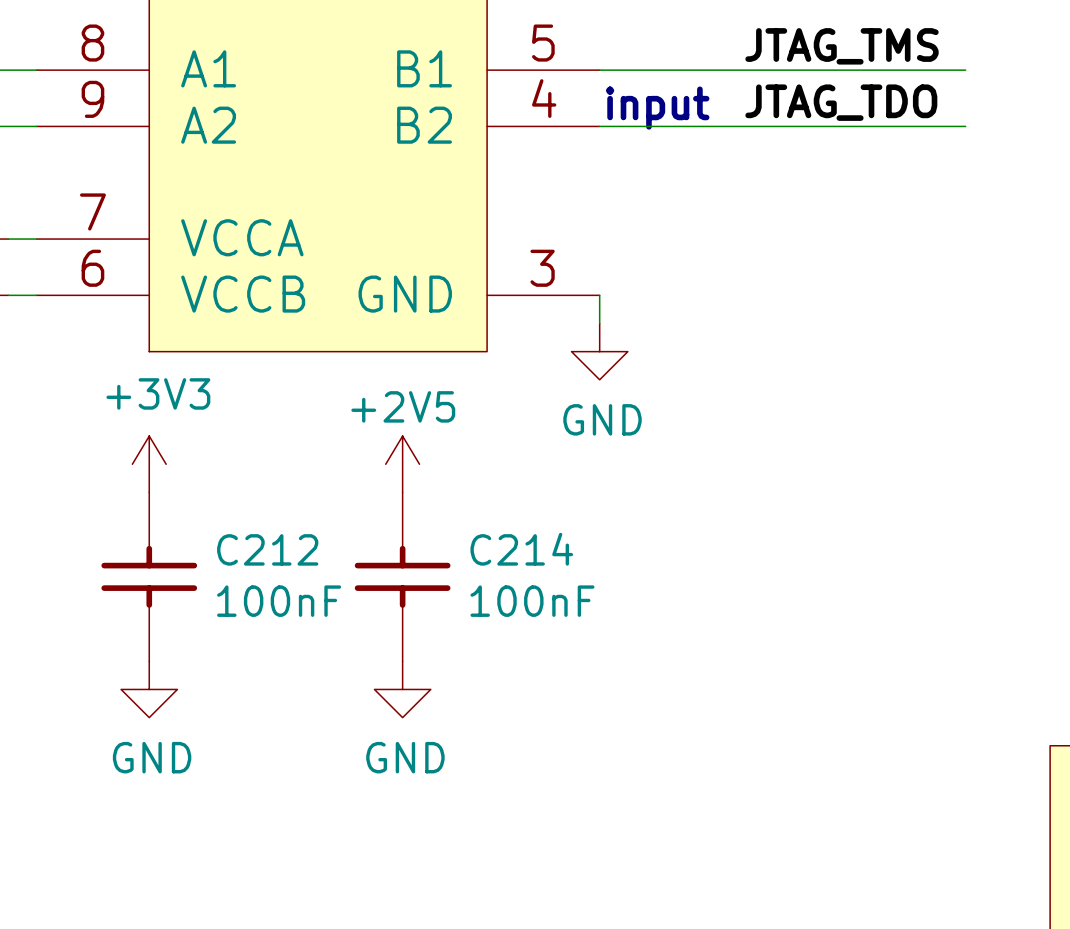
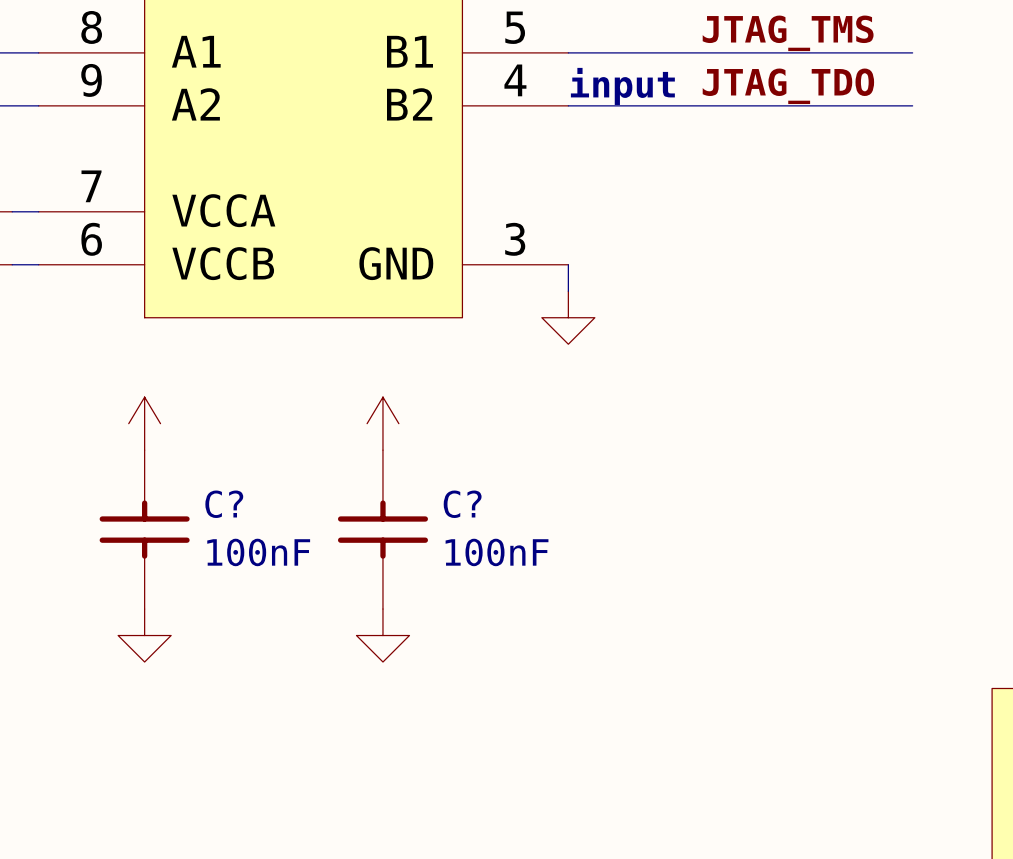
power symbol text: +3V3 (158, 393) -> none
power symbol text: +2V5 (403, 406) -> none
power symbol text: GND (602, 419) -> none
C212 name: C212 (267, 549) -> C? (224, 504)
C214 name: C214 (521, 549) -> C? (462, 504)
power symbol text: GND (152, 757) -> none
power symbol text: GND (405, 757) -> none

